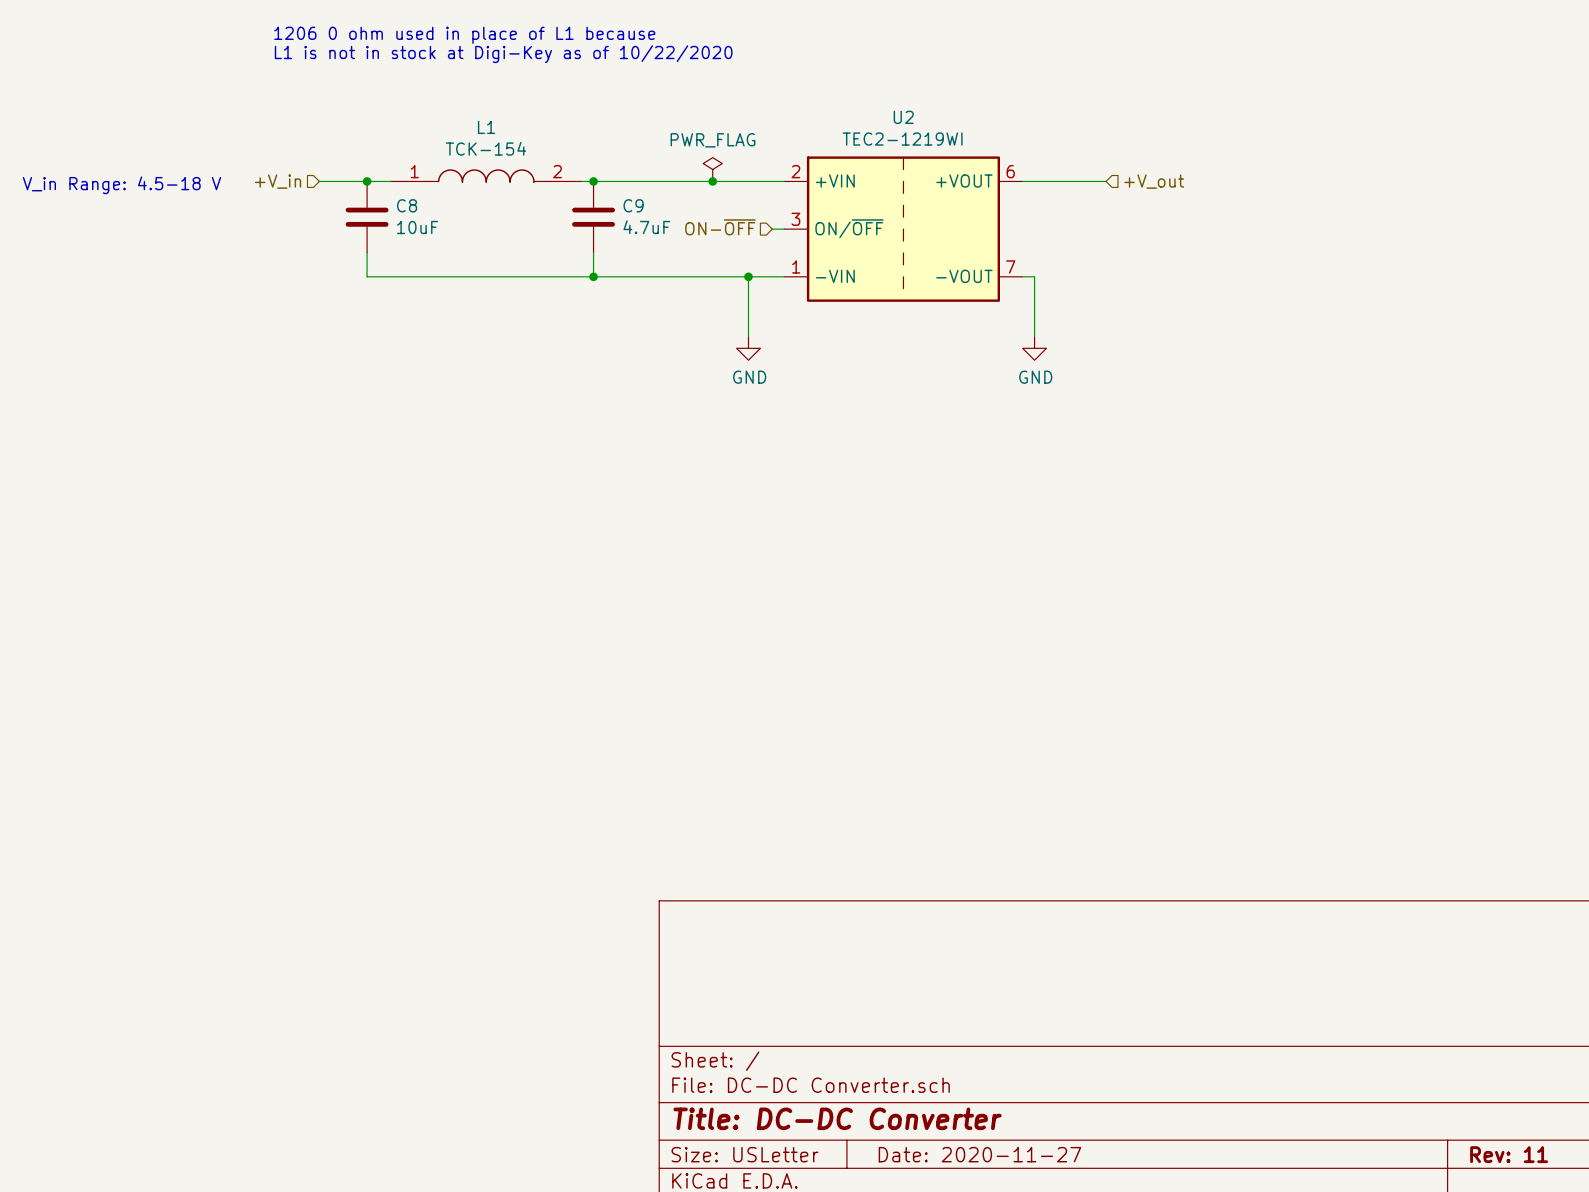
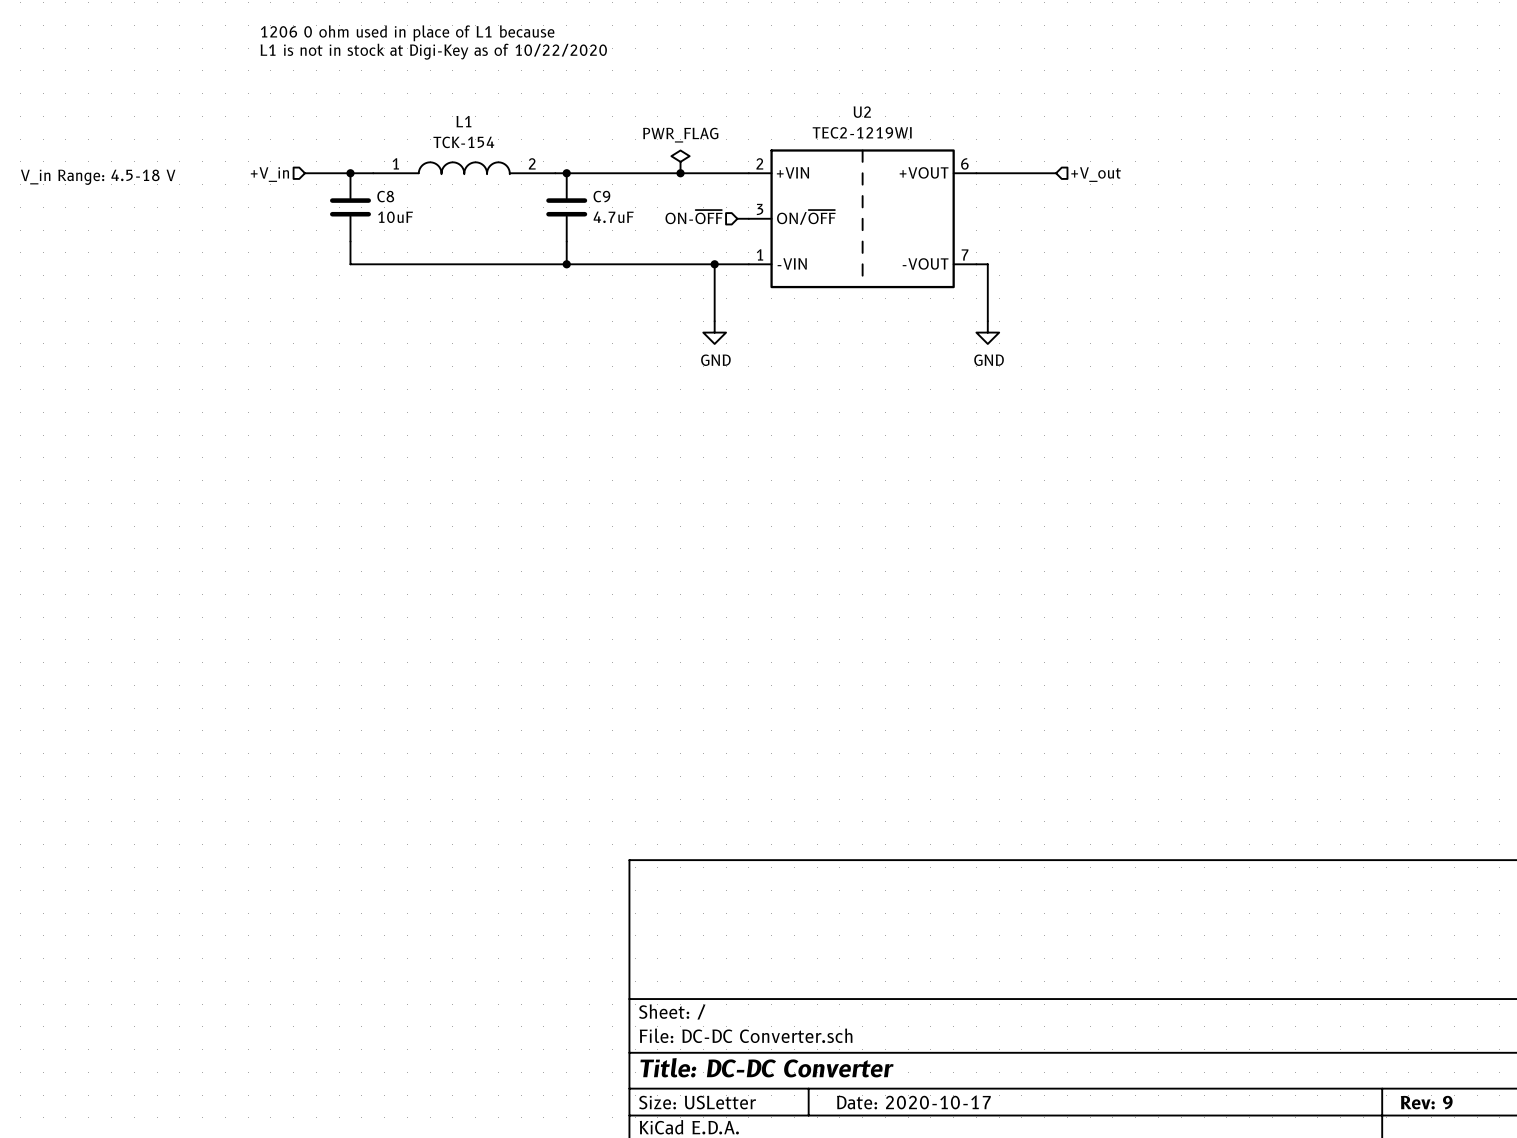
title block: Date: 2020-11-27 (979, 1154) -> Date: 2020-10-17 (913, 1102)
title block: Rev: 11 (1509, 1154) -> Rev: 9 (1426, 1102)

